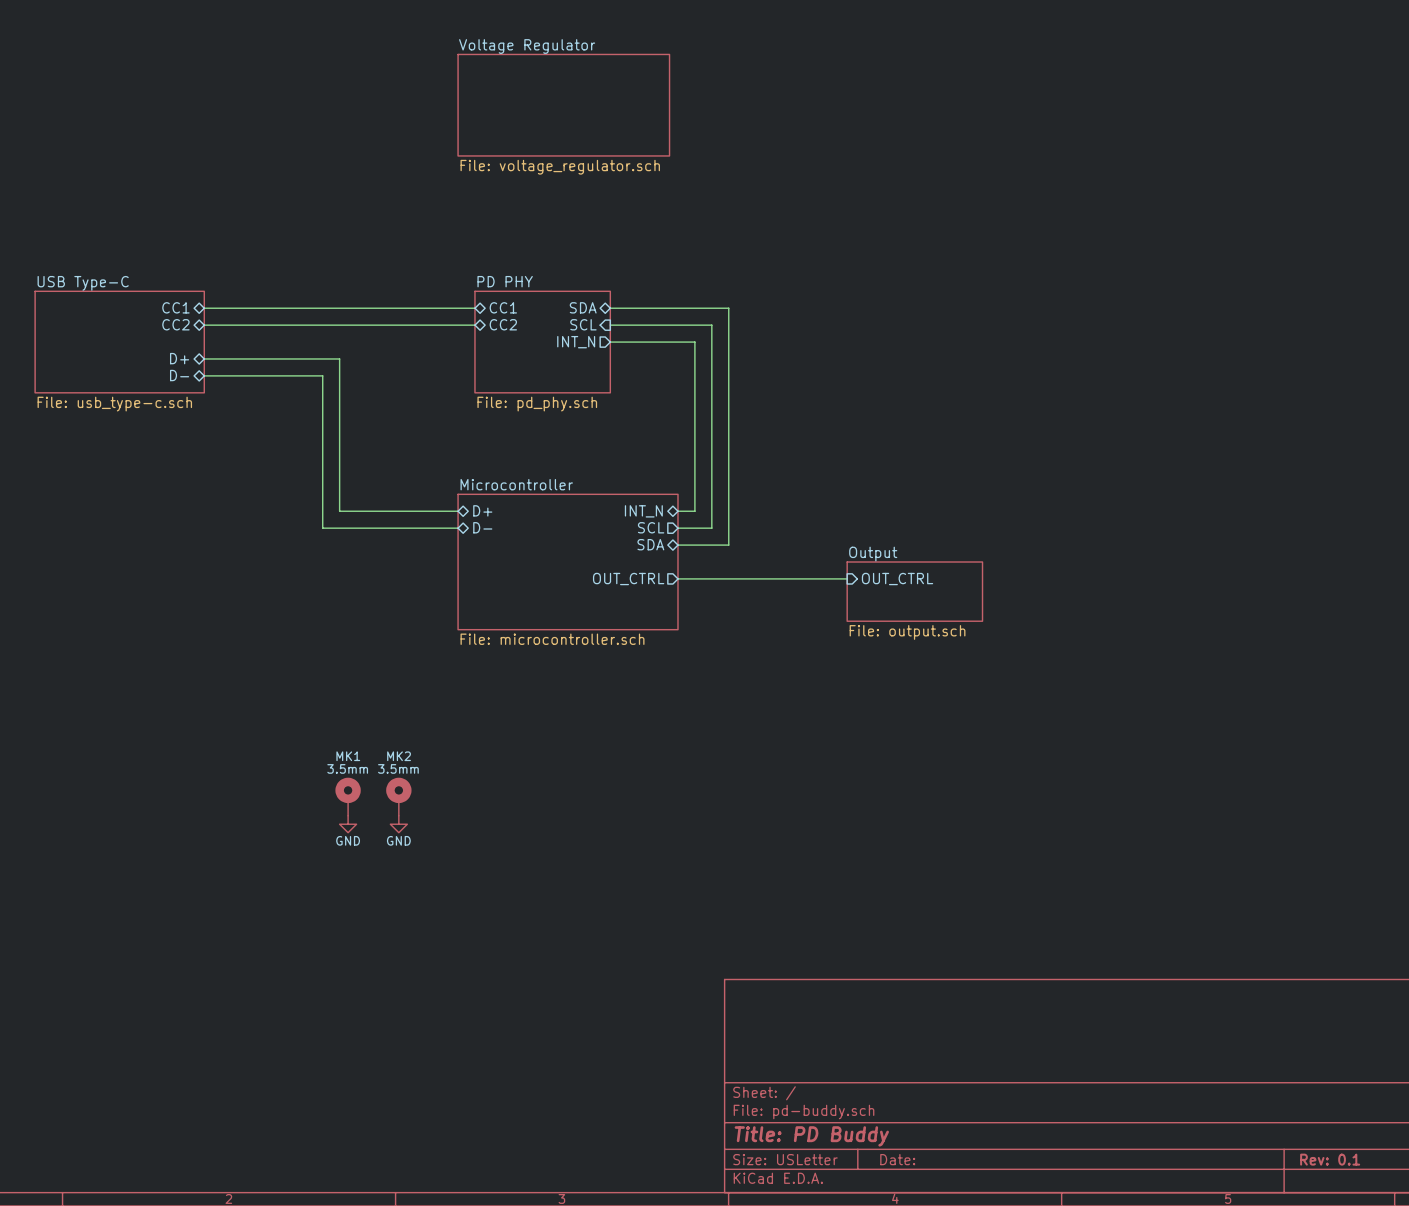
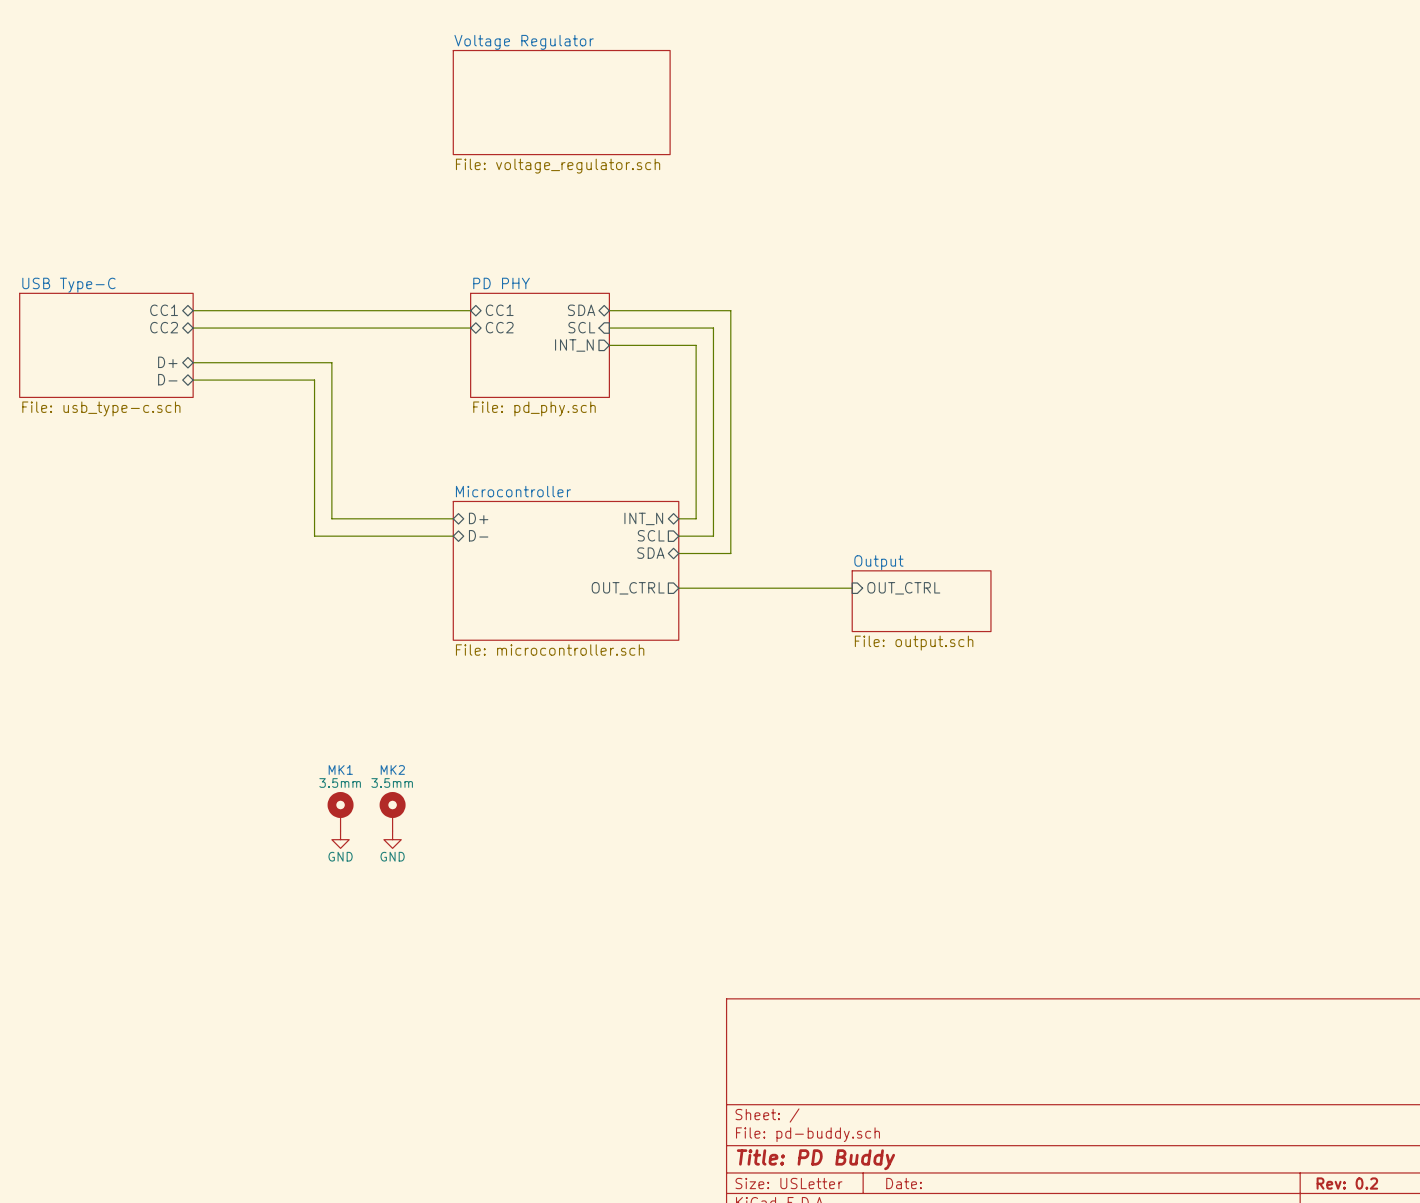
title block: Rev: 0.1 (1330, 1159) -> Rev: 0.2 (1347, 1183)

